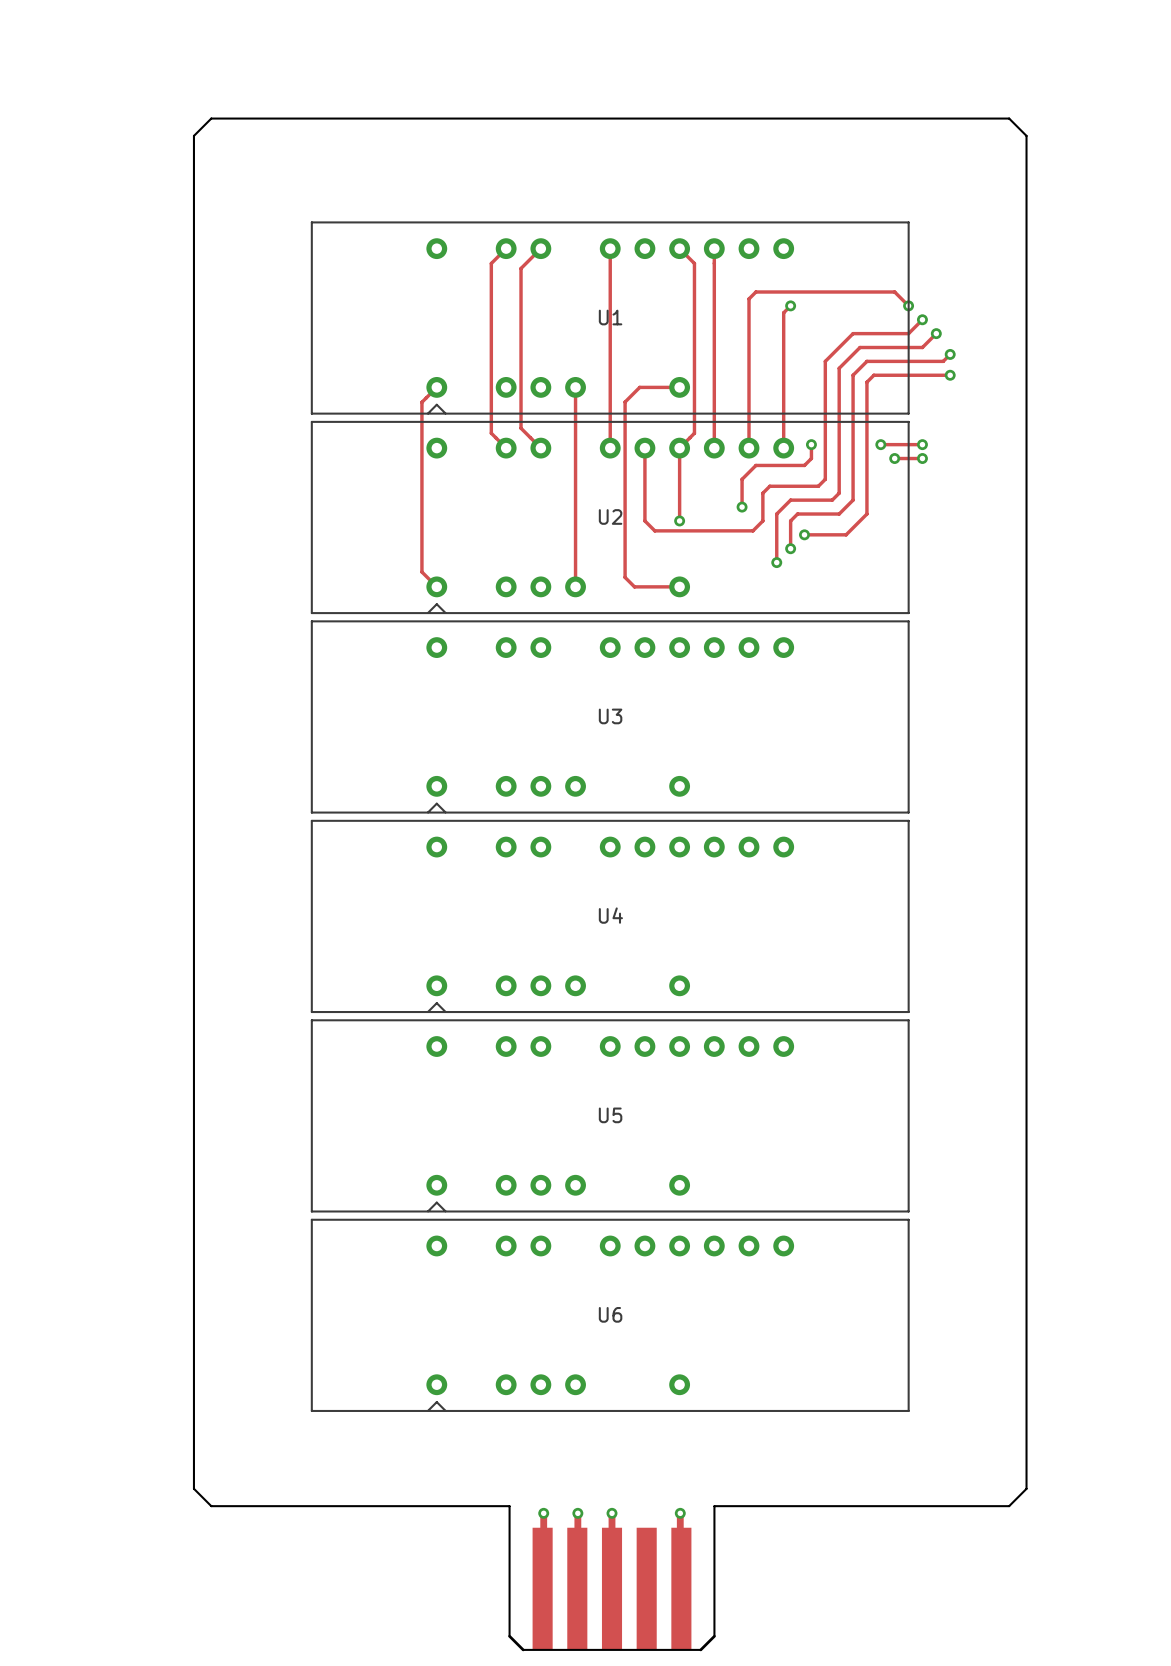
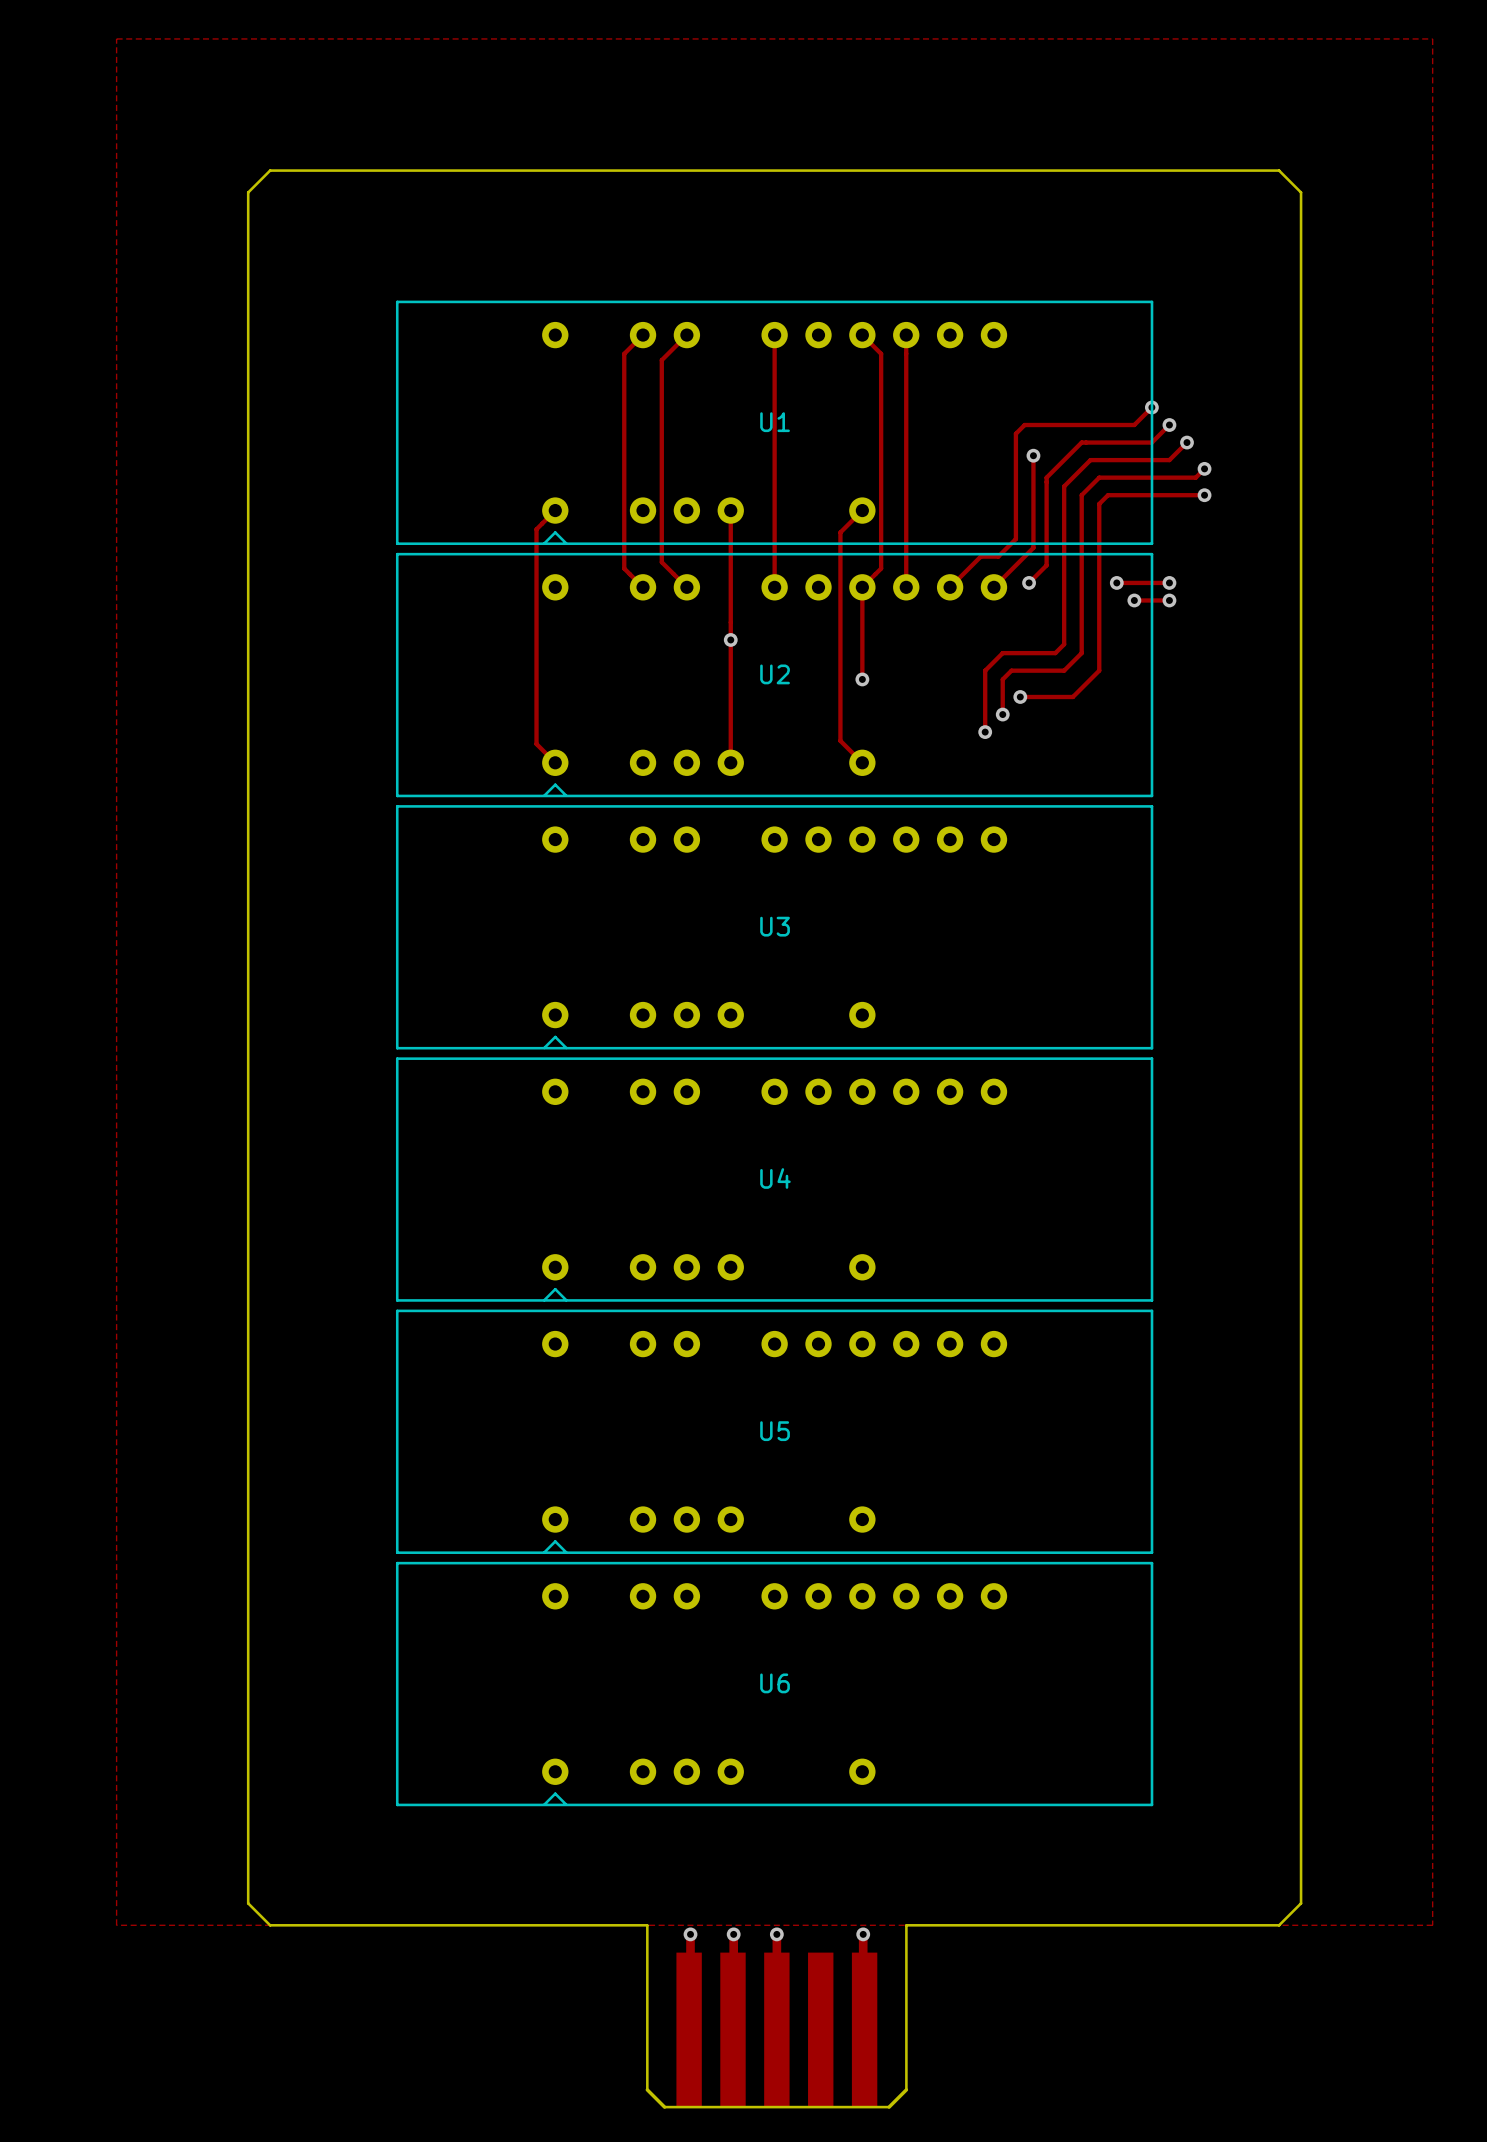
zone outline: none -> (116, 38) (1432, 38) (1432, 1925) (116, 1925) (116, 38)
track: (790, 305) (783, 312) (783, 448) -> (1033, 455) (1033, 547) (993, 587)
via position: (790, 305) -> (1033, 455)
track: (908, 305) (894, 292) (755, 292) (749, 298) (749, 448) -> (1151, 407) (1134, 425) (1024, 425) (1015, 433) (1015, 539) (998, 556) (980, 556) (950, 587)
track: (679, 387) (639, 387) (625, 402) (625, 577) (634, 586) (679, 586) -> (862, 510) (840, 532) (840, 740) (862, 762)
track: (825, 430) (825, 479) (818, 486) (769, 486) (762, 493) (762, 520) (752, 530) (654, 530) (644, 520) (644, 448) -> (1046, 565) (1033, 578)
track: (811, 444) (811, 458) (804, 465) (755, 465) (742, 479) (742, 507) -> none
via: none -> (730, 639)
via: (742, 507) -> none

